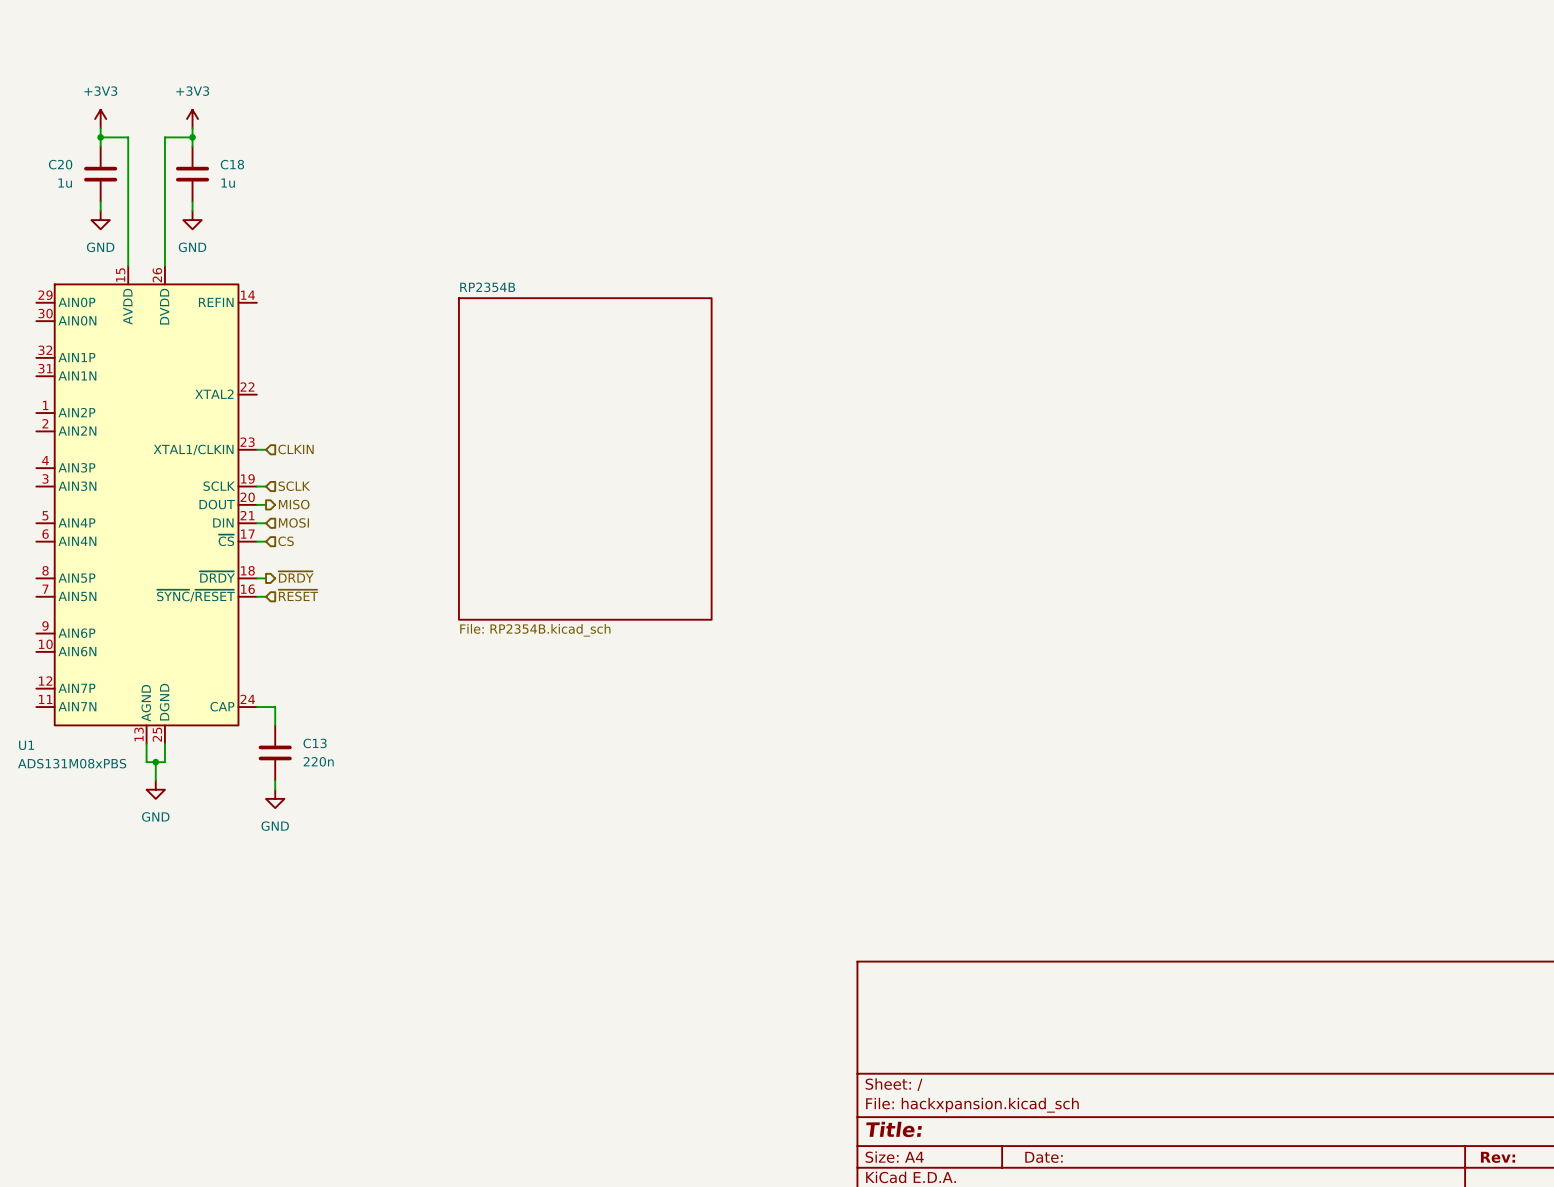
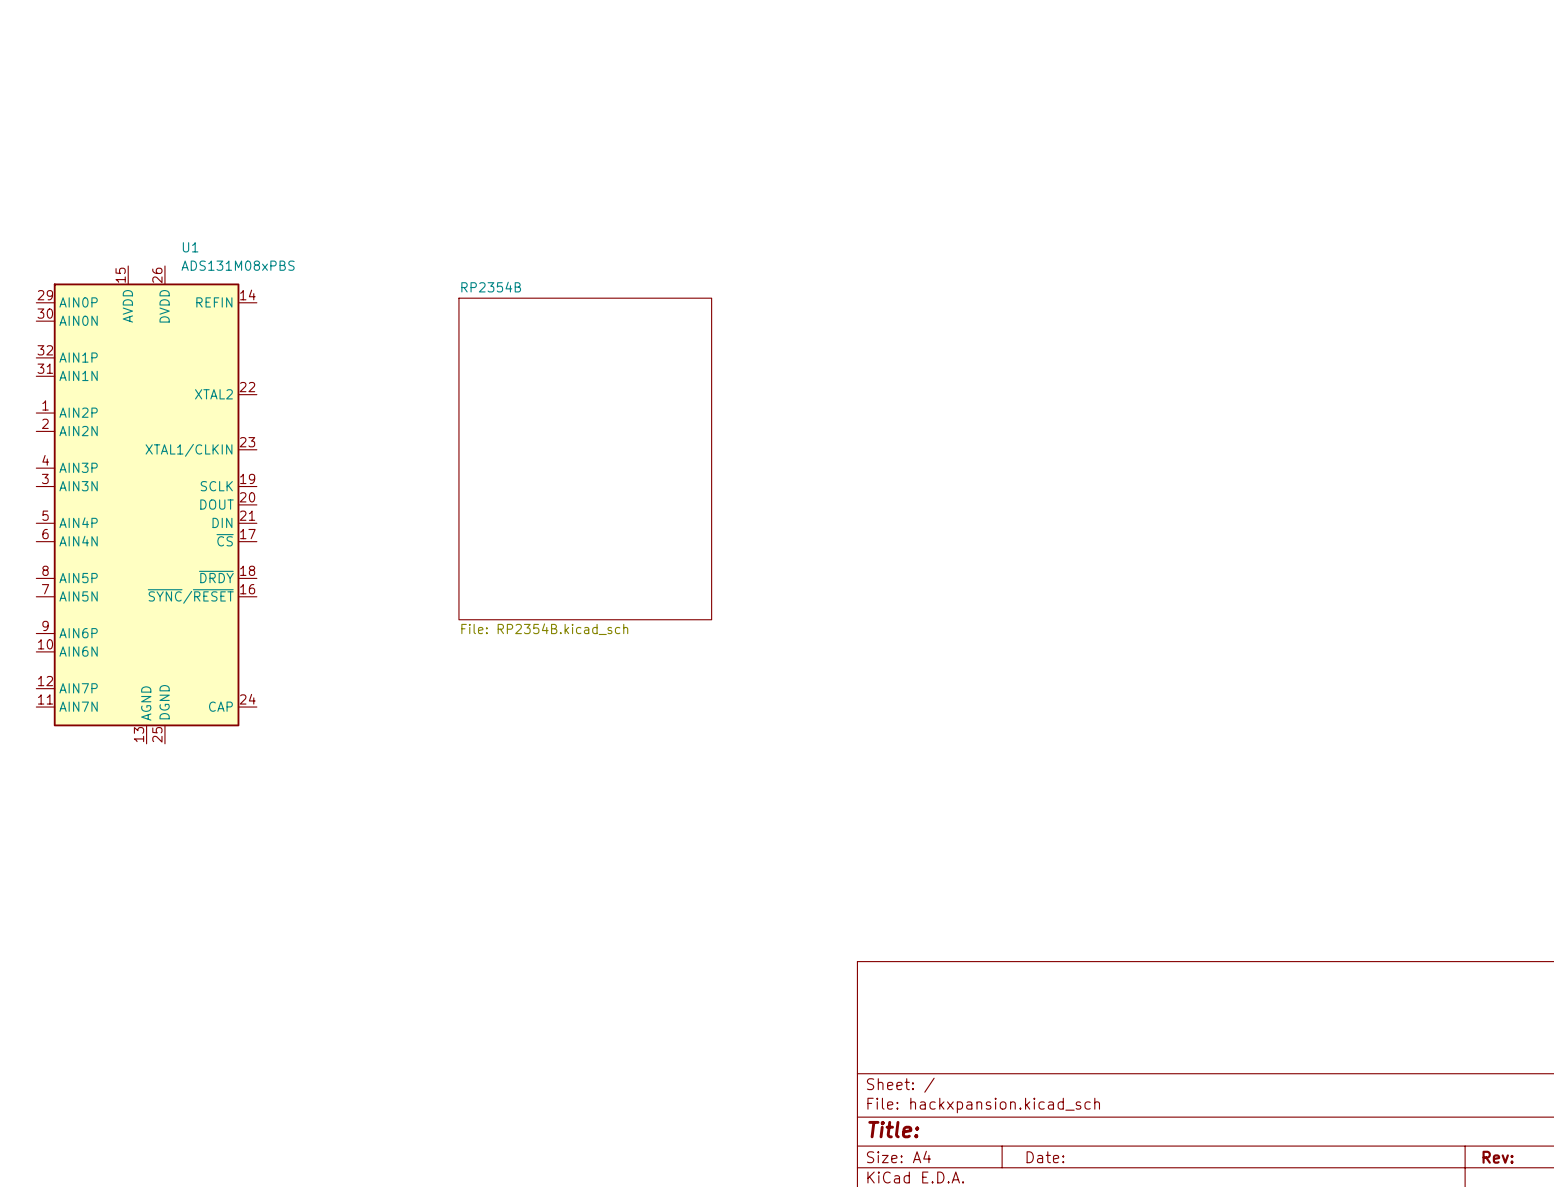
power symbol: +3V3 (100, 119) -> none
power symbol: +3V3 (192, 119) -> none
wire: (100, 128) (100, 146) -> none
wire: (192, 128) (192, 146) -> none
wire: (100, 137) (128, 137) (128, 266) -> none
junction: (100, 137) -> none
wire: (192, 137) (164, 137) (164, 266) -> none
junction: (192, 137) -> none
C20: 1u (100, 174) -> none
C18: 1u (192, 174) -> none
wire: (100, 201) (100, 210) -> none
wire: (192, 201) (192, 210) -> none
power symbol: GND (100, 220) -> none
power symbol: GND (192, 220) -> none
wire: (256, 449) (266, 449) -> none
hierarchical label: CLKIN (296, 449) -> none
wire: (256, 486) (266, 486) -> none
hierarchical label: SCLK (294, 486) -> none
wire: (256, 504) (266, 504) -> none
hierarchical label: MISO (294, 504) -> none
hierarchical label: MOSI (293, 522) -> none
wire: (256, 523) (266, 523) -> none
wire: (256, 541) (266, 541) -> none
hierarchical label: CS (286, 541) -> none
hierarchical label: ~{DRDY} (296, 577) -> none
wire: (256, 578) (266, 578) -> none
hierarchical label: ~{RESET} (298, 595) -> none
wire: (256, 596) (266, 596) -> none
wire: (256, 707) (275, 707) (275, 725) -> none
wire: (146, 743) (146, 762) (164, 762) (164, 743) -> none
U1 name position: U1 (26, 745) -> U1 (190, 247)
C13: 220n (275, 752) -> none
wire: (155, 762) (155, 780) -> none
junction: (155, 762) -> none
U1 value position: ADS131M08xPBS (72, 763) -> ADS131M08xPBS (238, 265)
wire: (275, 780) (275, 789) -> none
power symbol: GND (155, 789) -> none
power symbol: GND (275, 798) -> none

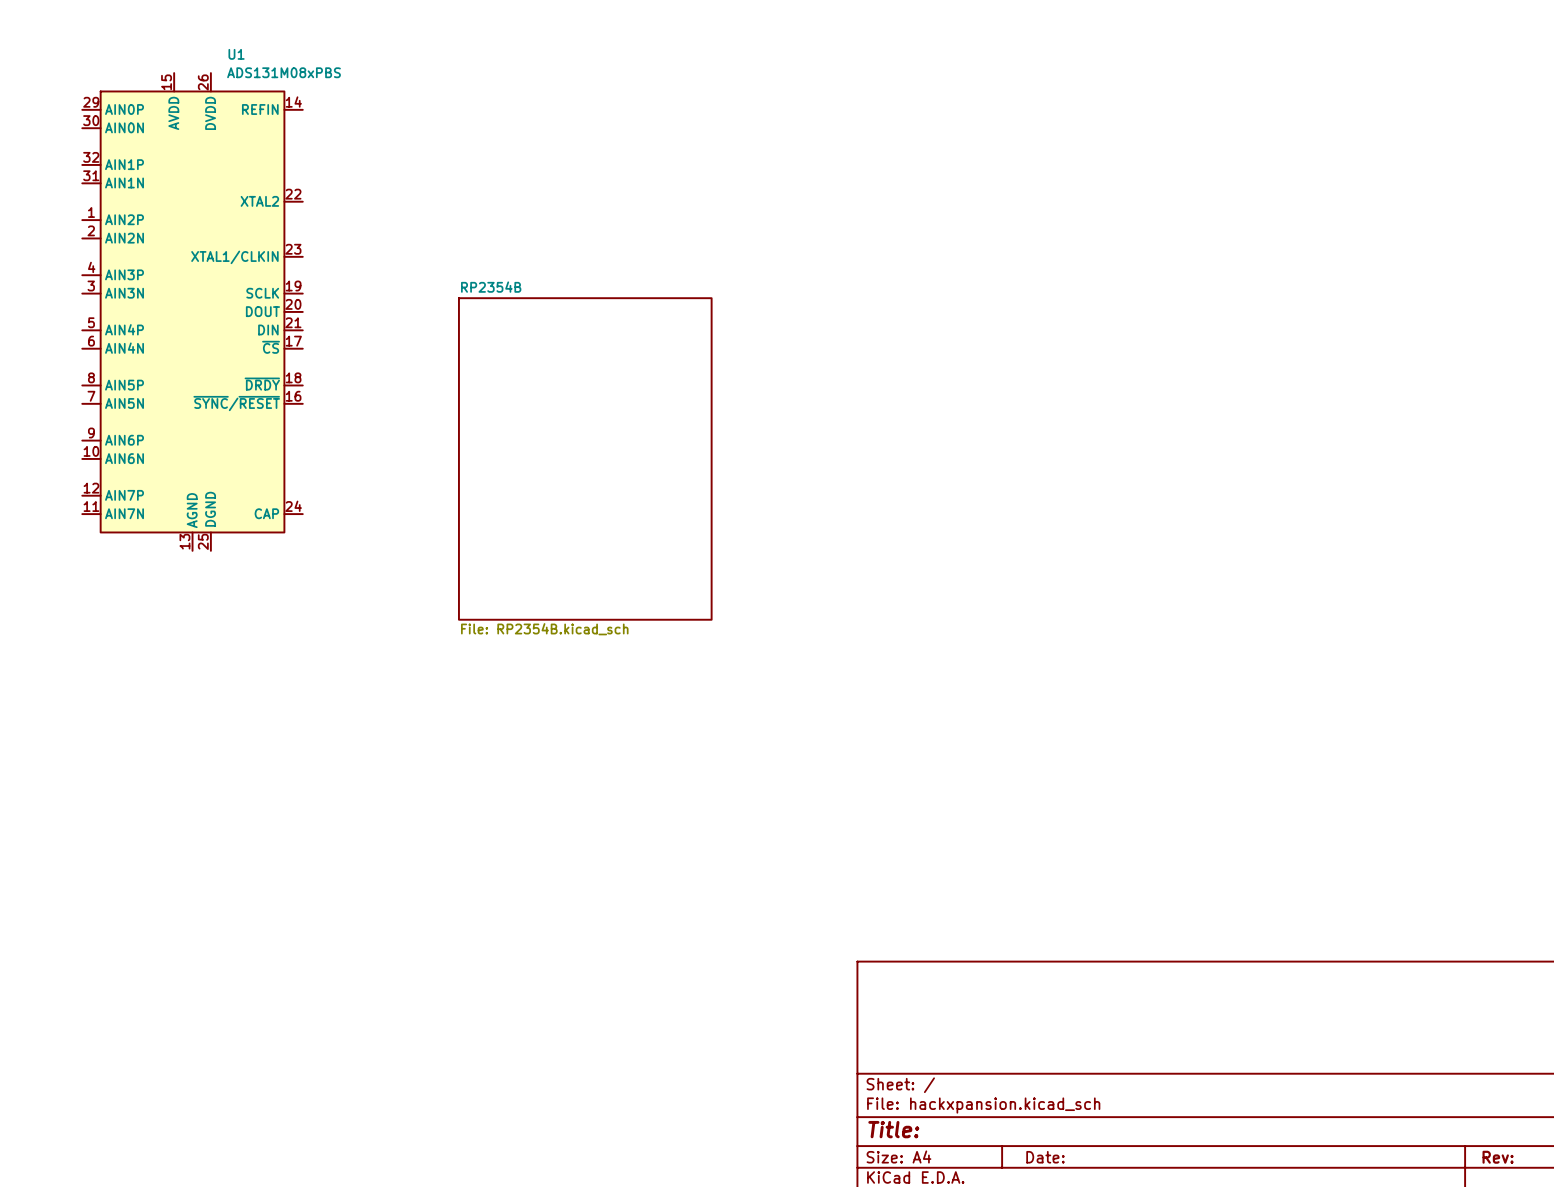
U1 position: (146, 504) -> (192, 311)

